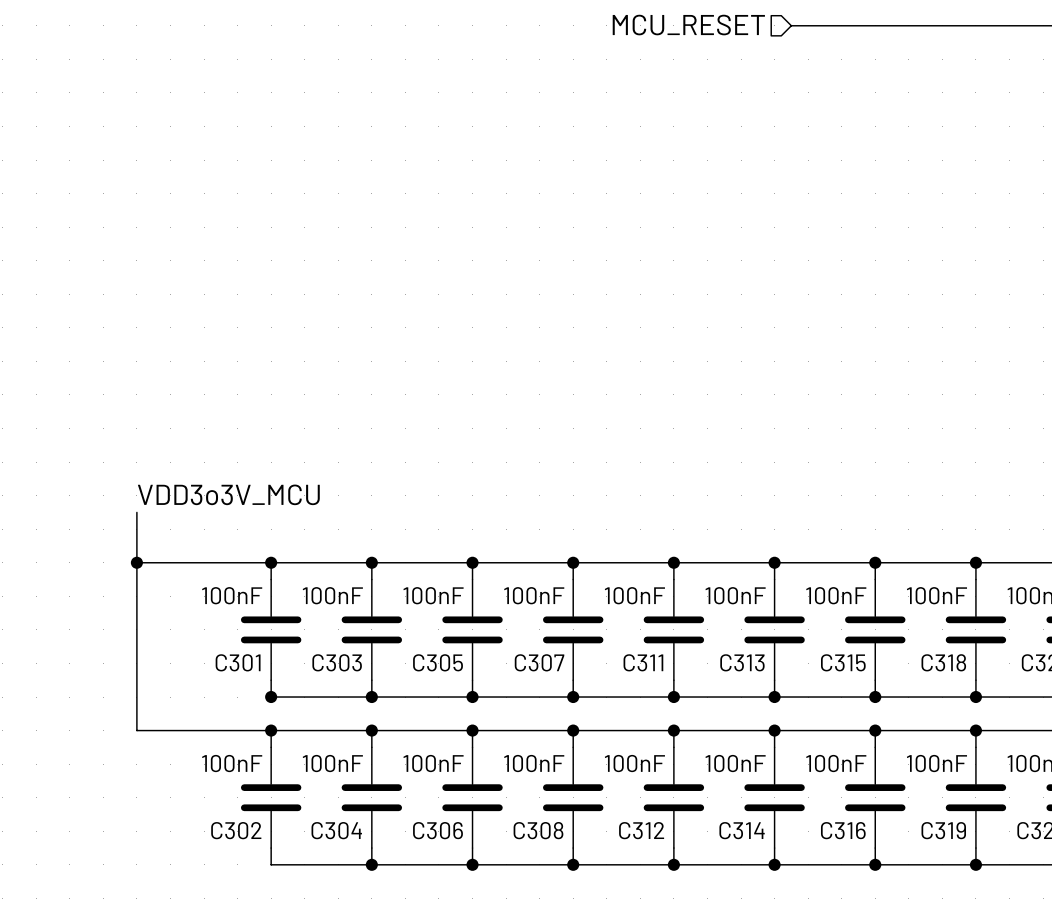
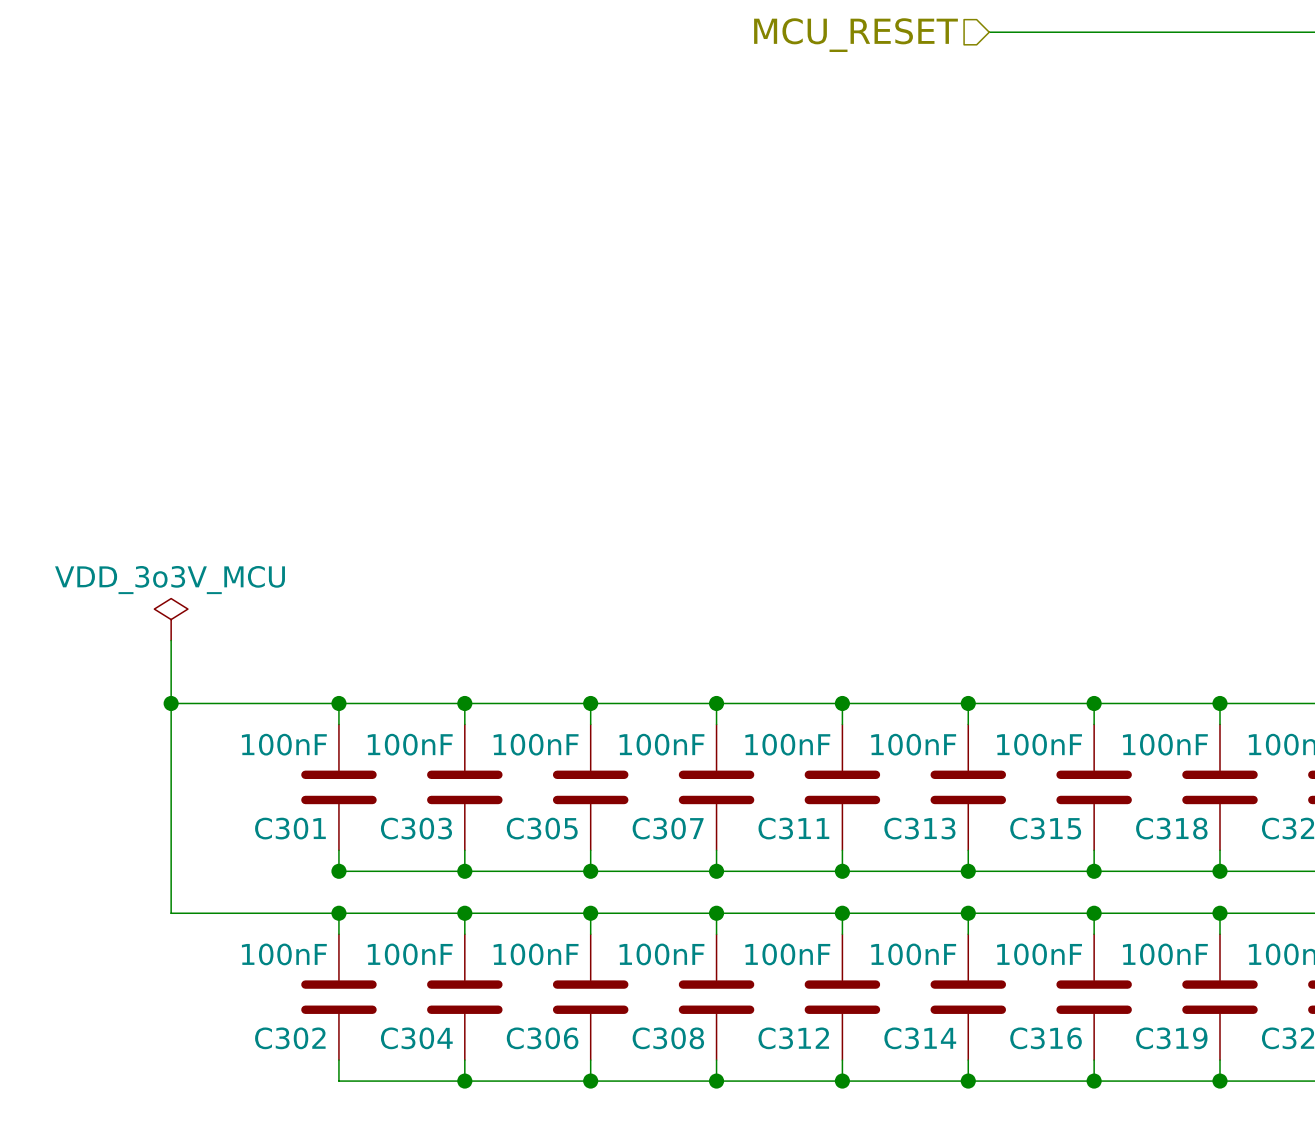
label: VDD3o3V_MCU (228, 494) -> none
power symbol: none -> VDD_3o3V_MCU (171, 619)

